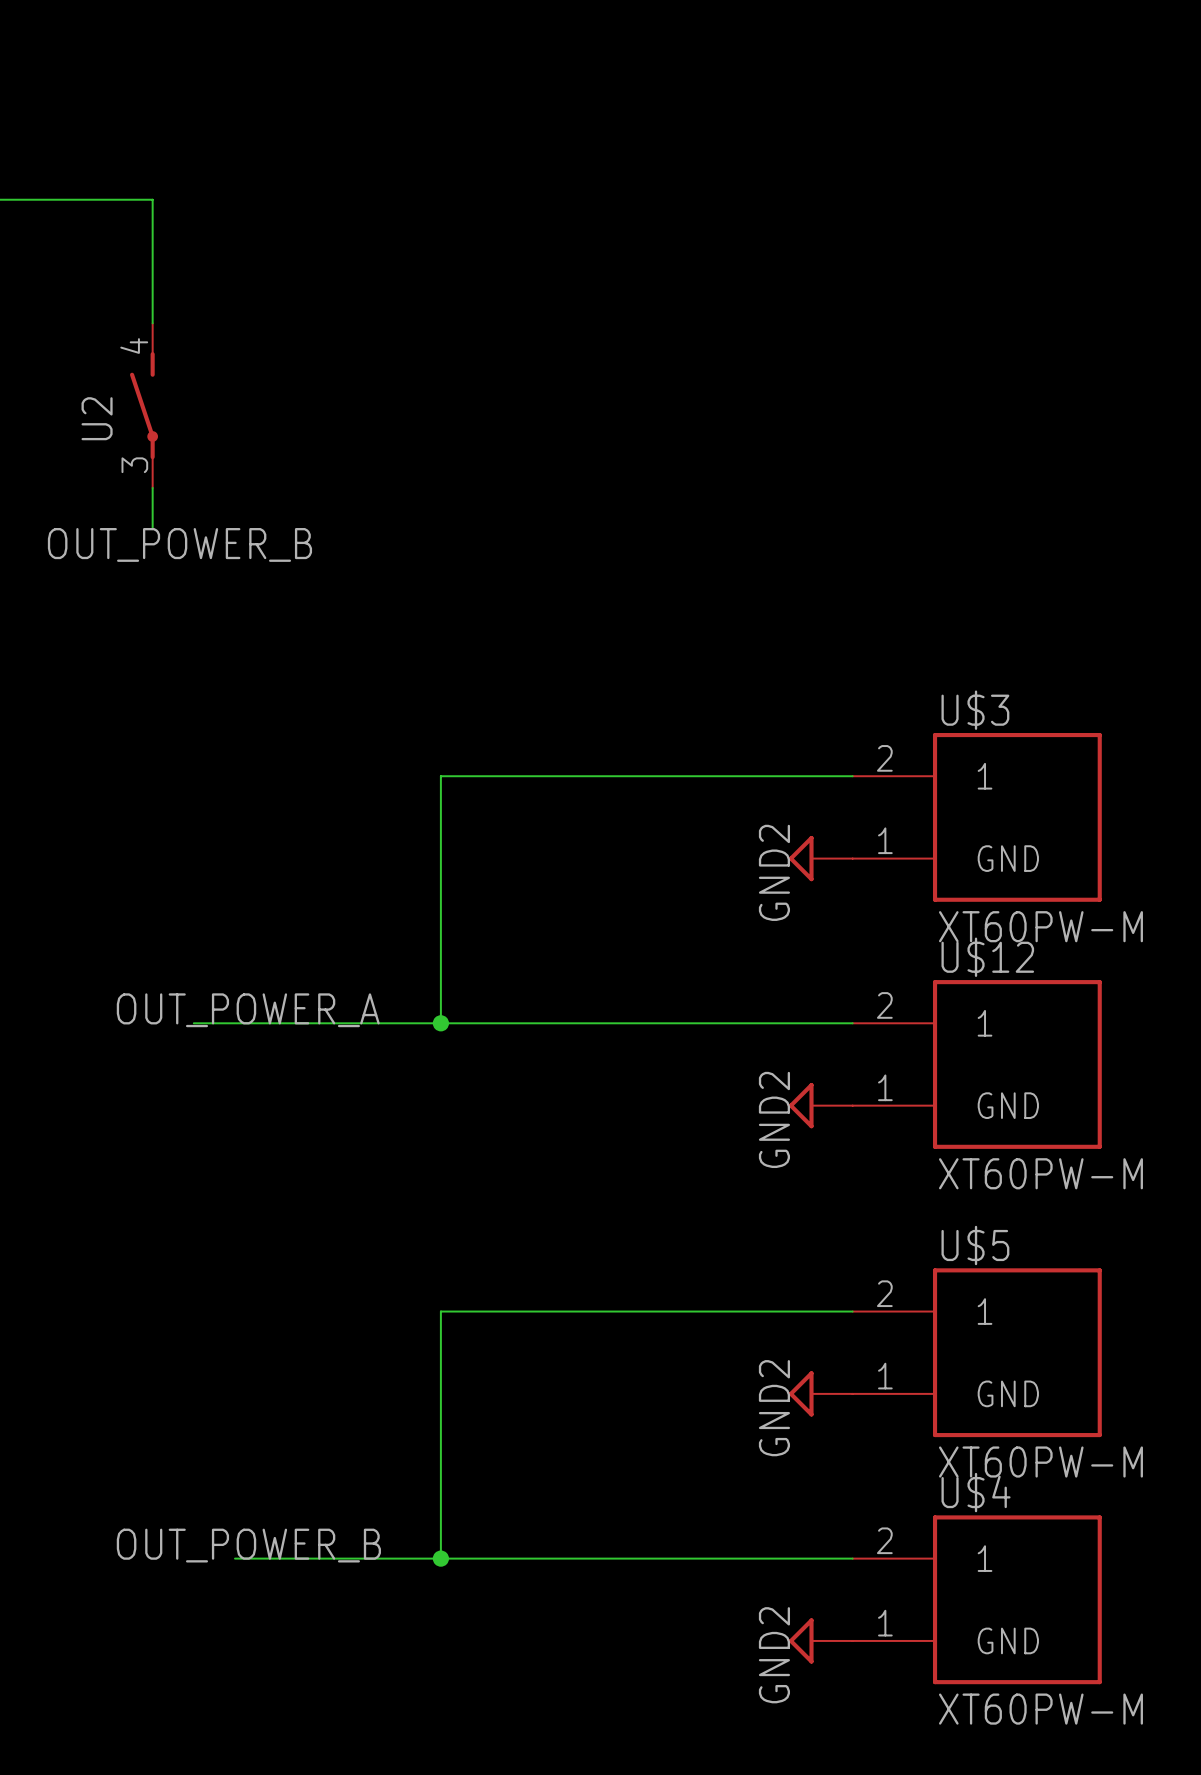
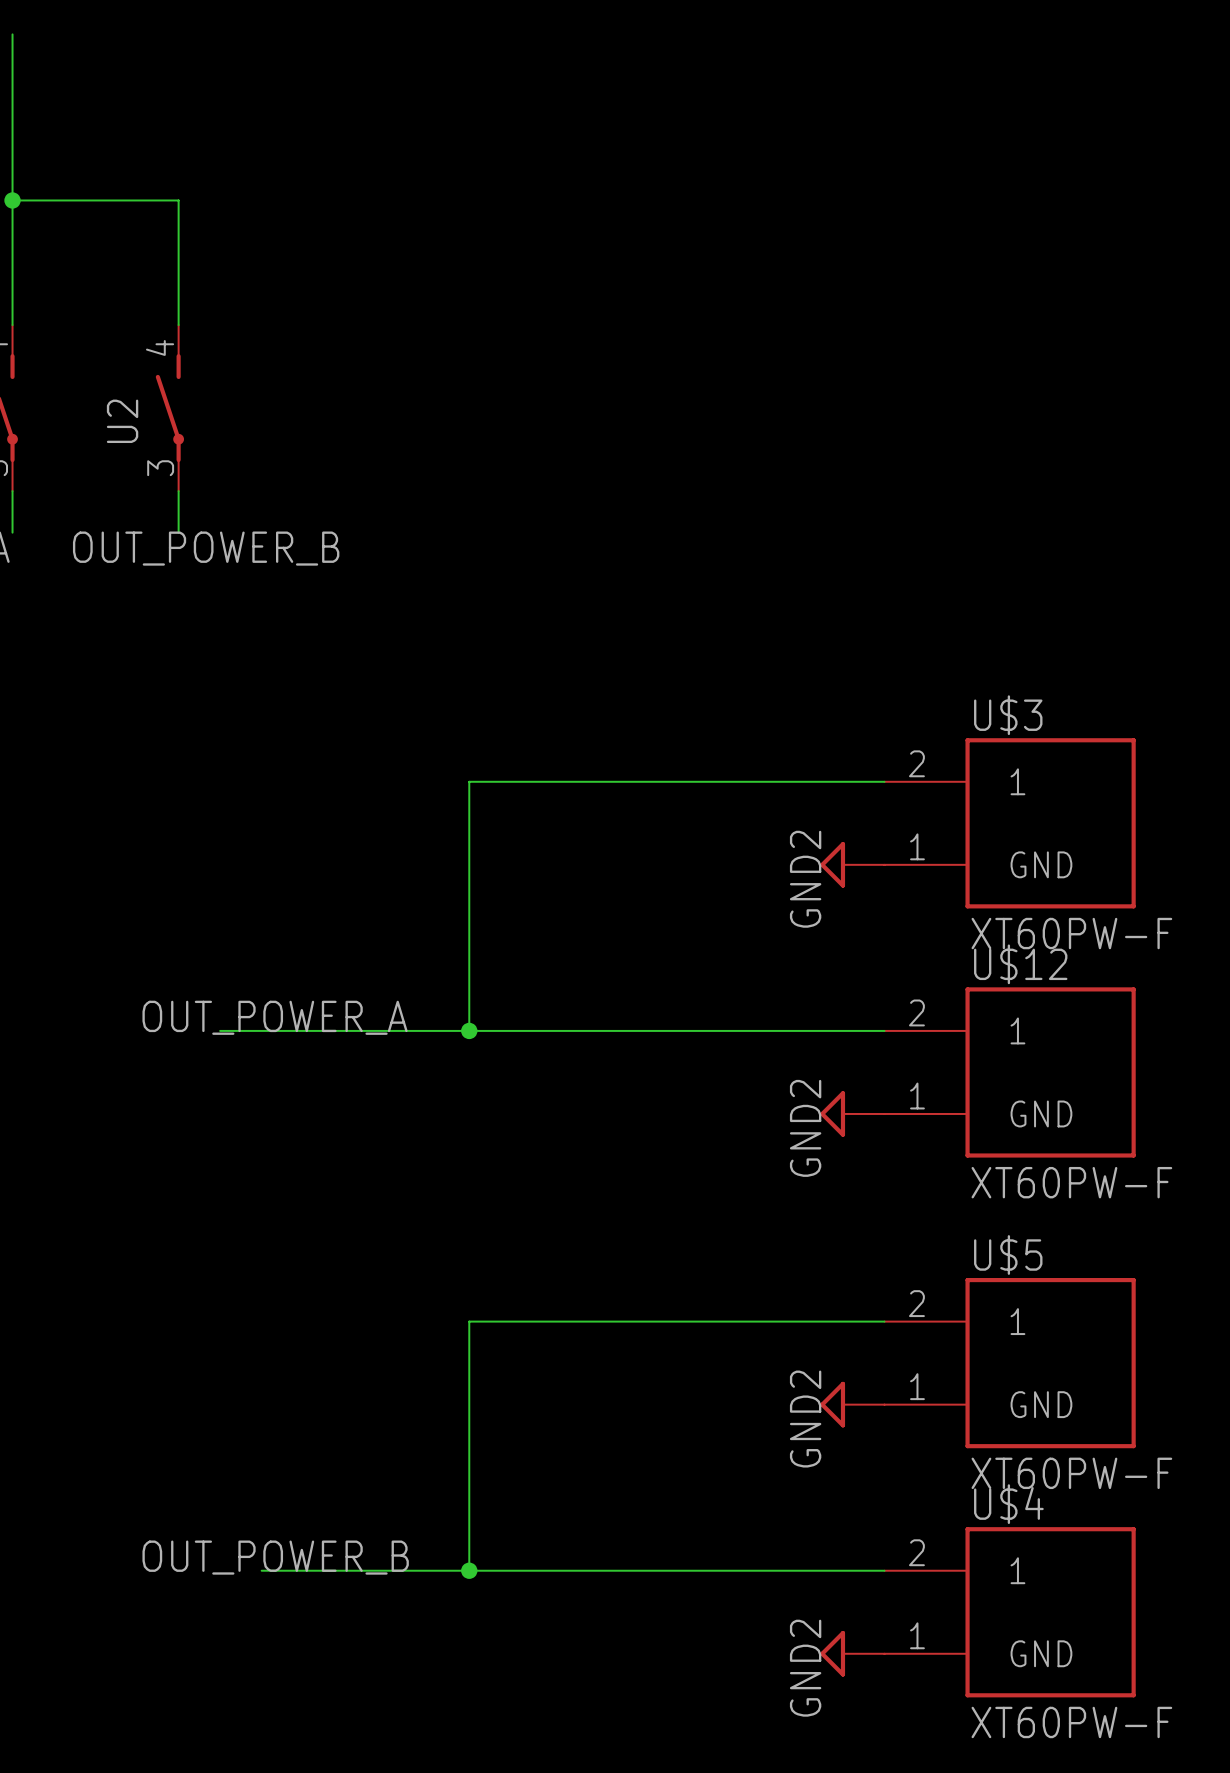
U$3 value: XT60PW-M (1040, 926) -> XT60PW-F (1071, 933)
U$12 value: XT60PW-M (1040, 1173) -> XT60PW-F (1071, 1182)
U$5 value: XT60PW-M (1040, 1462) -> XT60PW-F (1071, 1473)
U$4 value: XT60PW-M (1040, 1709) -> XT60PW-F (1071, 1722)

